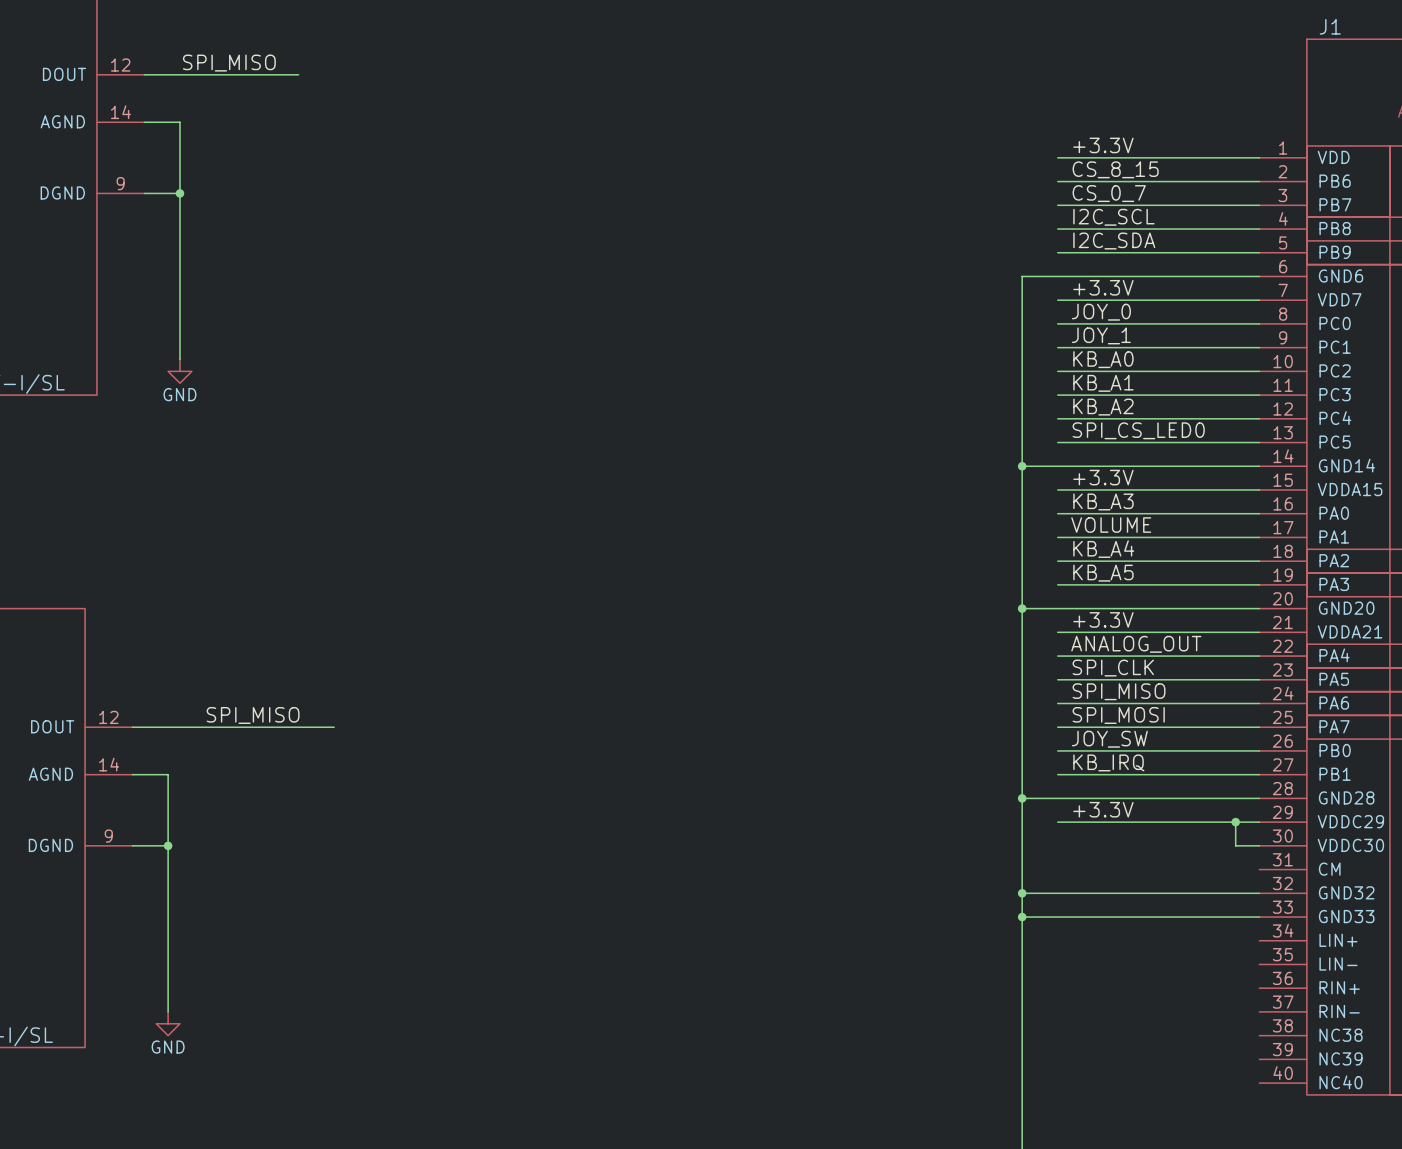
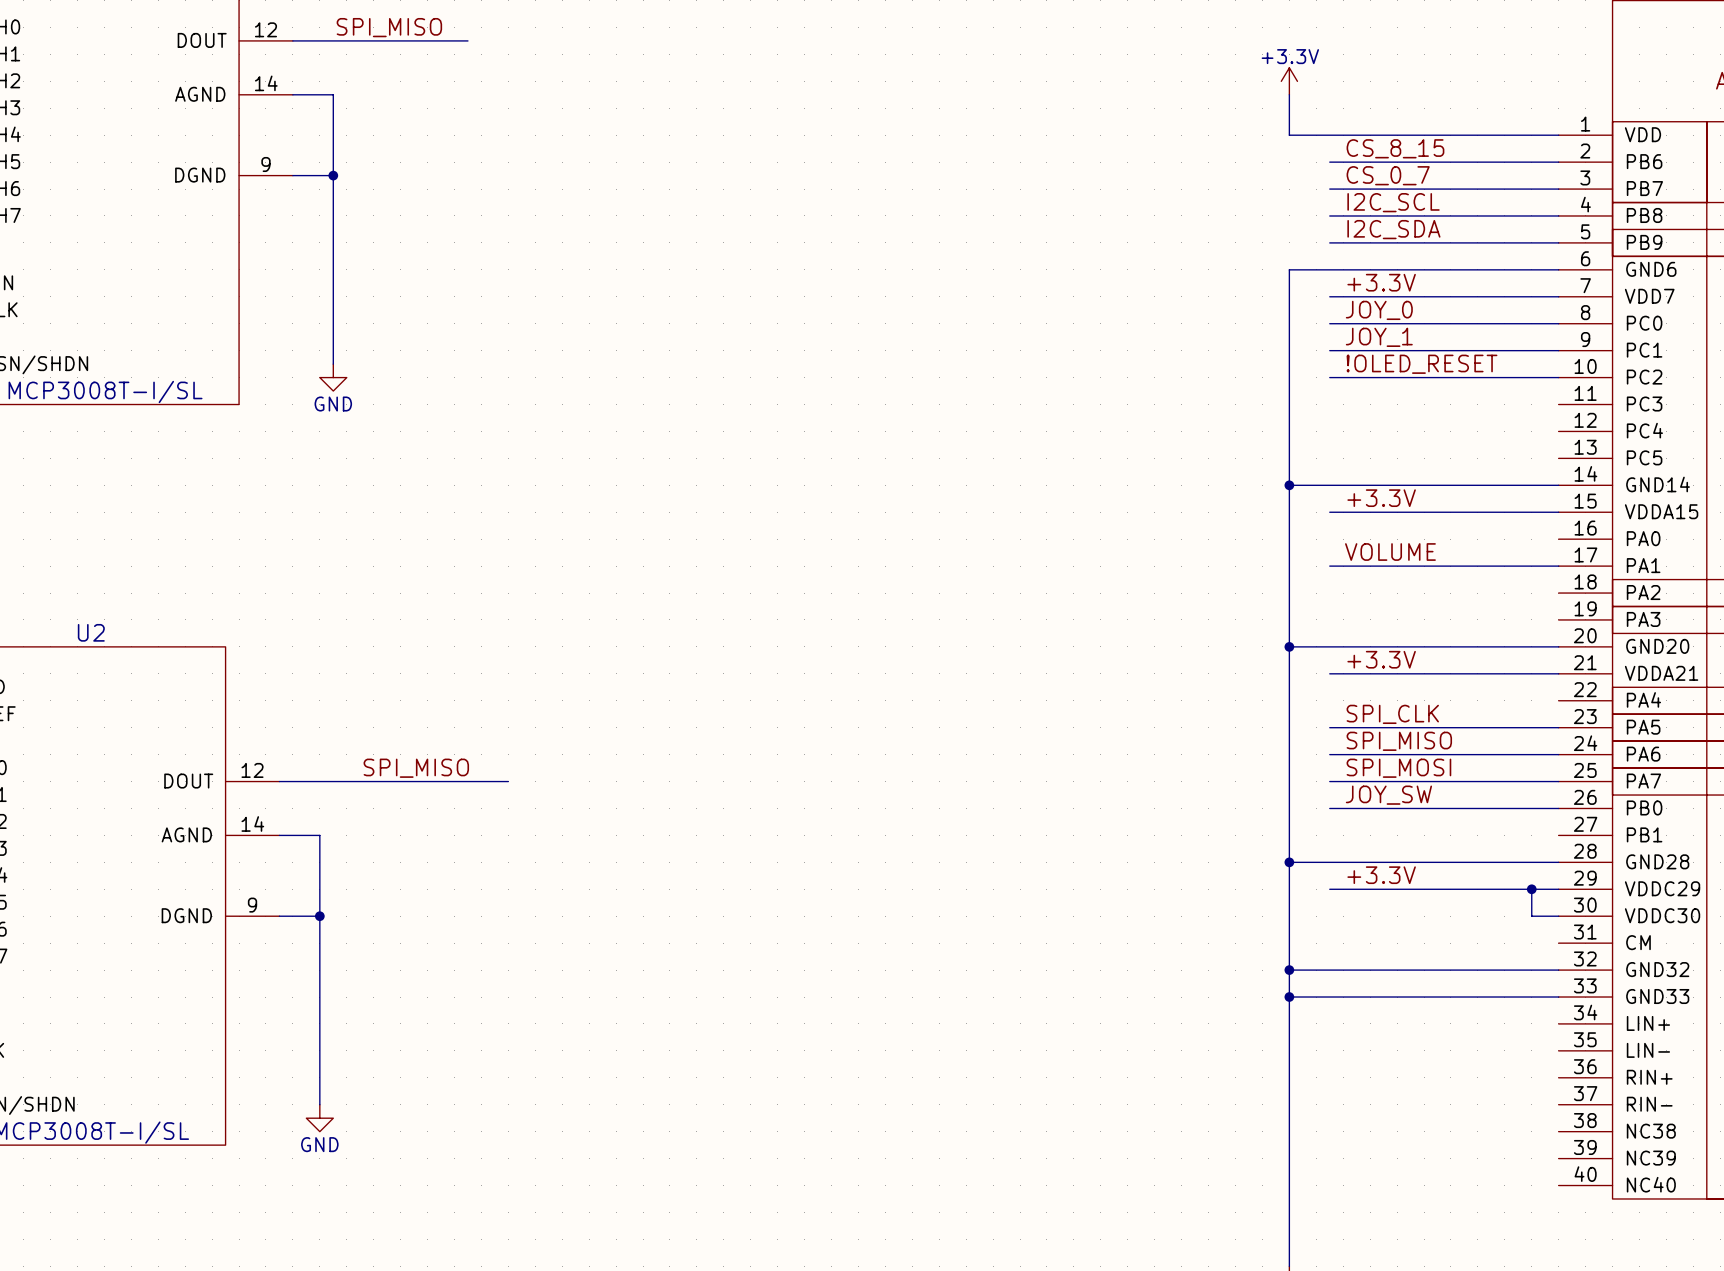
power symbol: none -> +3.3V (1289, 81)
wire: none -> (1289, 94) (1289, 135) (1329, 135)
label: +3.3V (1103, 145) -> none
label: KB_A0 (1103, 359) -> !OLED_RESET (1422, 364)
label: KB_A1 (1103, 383) -> none
wire: (1057, 395) (1259, 395) -> none
label: KB_A2 (1103, 407) -> none
wire: (1057, 418) (1259, 418) -> none
label: SPI_CS_LED0 (1138, 430) -> none
wire: (1057, 442) (1259, 442) -> none
label: KB_A3 (1103, 501) -> none
wire: (1057, 513) (1259, 513) -> none
label: KB_A4 (1103, 549) -> none
wire: (1057, 561) (1259, 561) -> none
label: KB_A5 (1103, 573) -> none
wire: (1057, 584) (1259, 584) -> none
label: ANALOG_OUT (1136, 644) -> none
wire: (1057, 656) (1259, 656) -> none
label: KB_IRQ (1108, 762) -> none
wire: (1057, 774) (1259, 774) -> none

